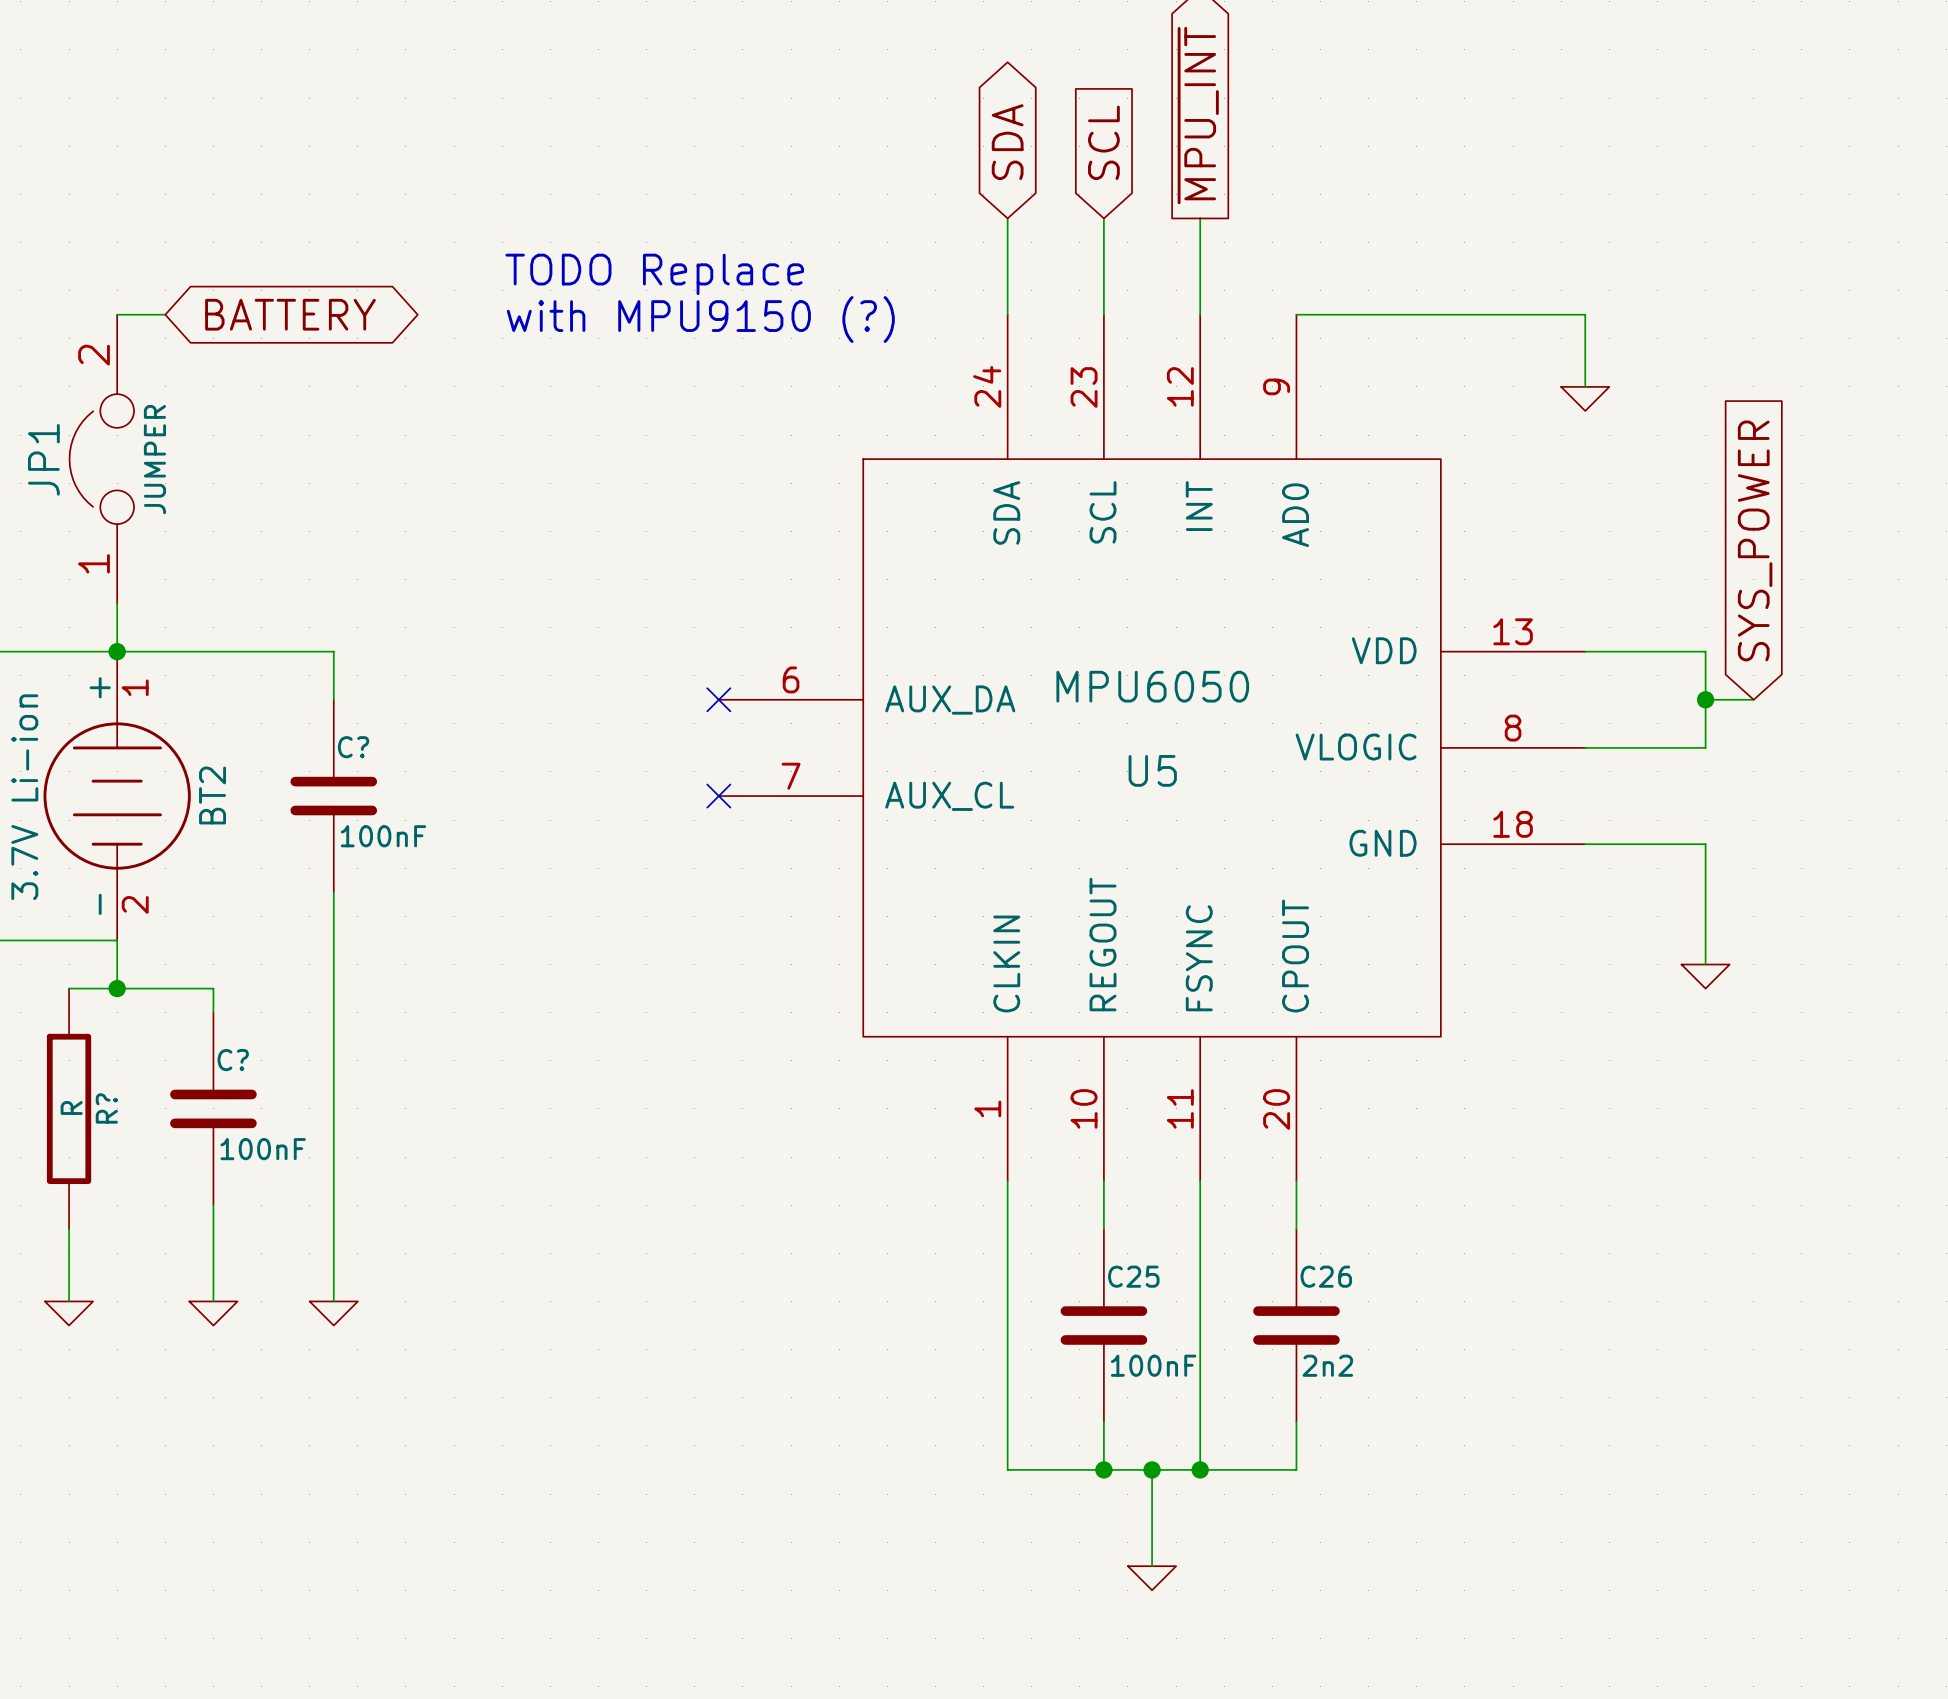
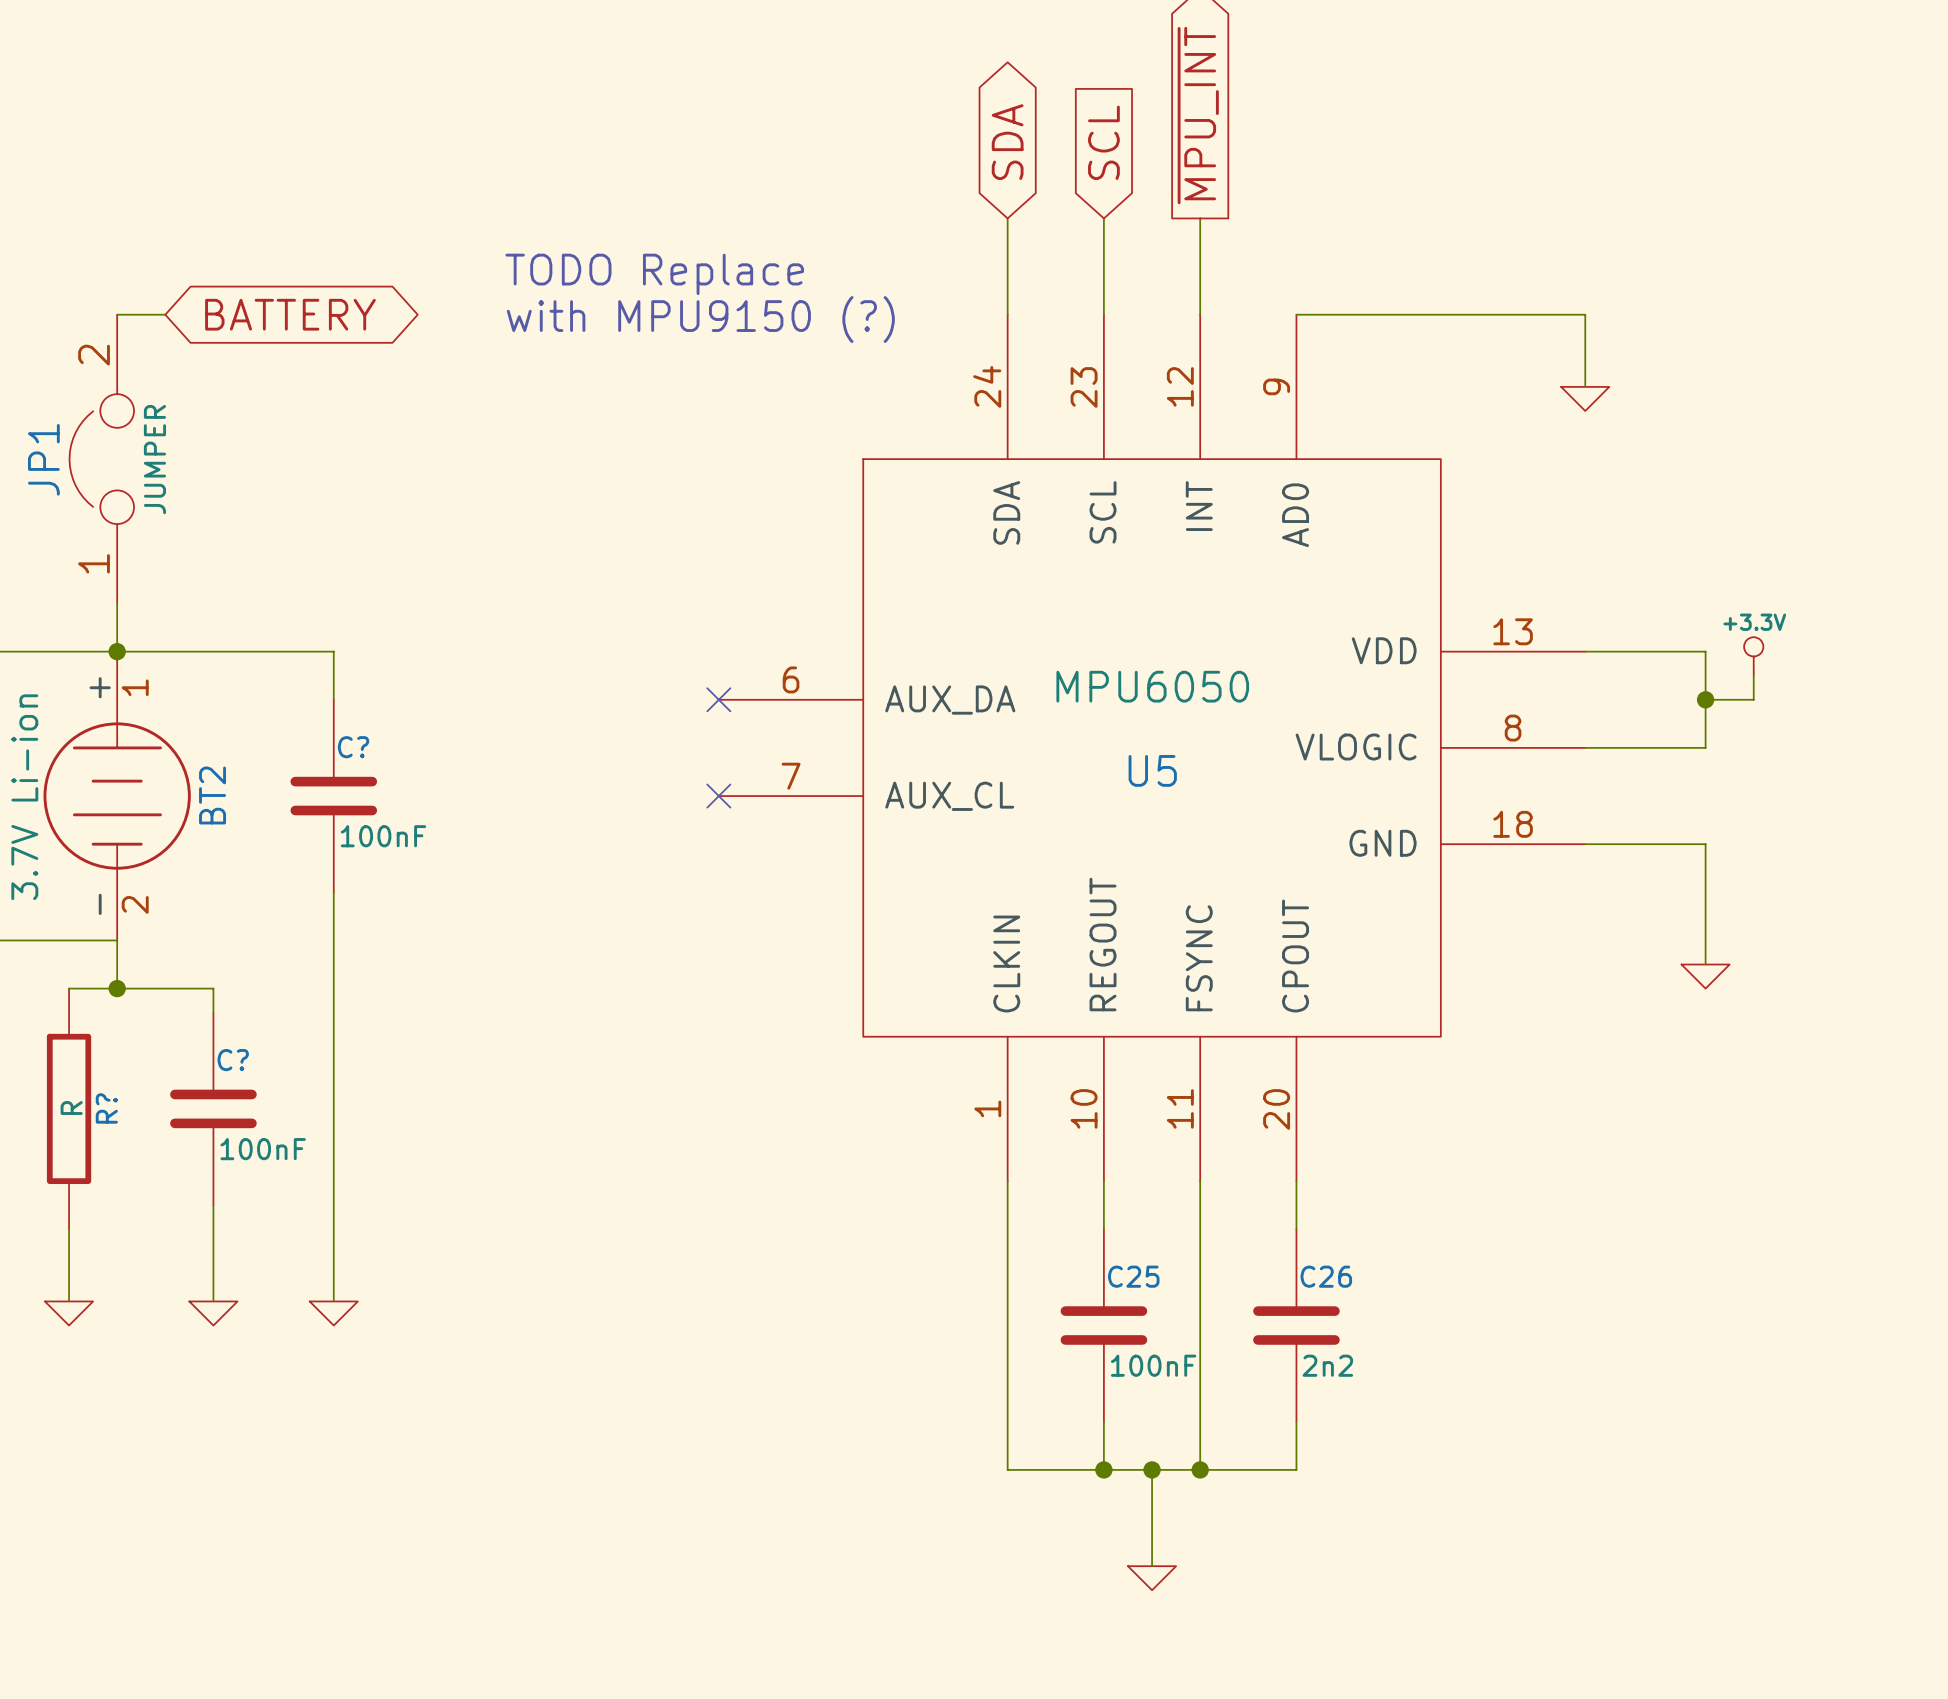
global label: SYS_POWER (1755, 540) -> none
power symbol: none -> +3.3V (1753, 656)
wire: none -> (1753, 675) (1753, 699)

